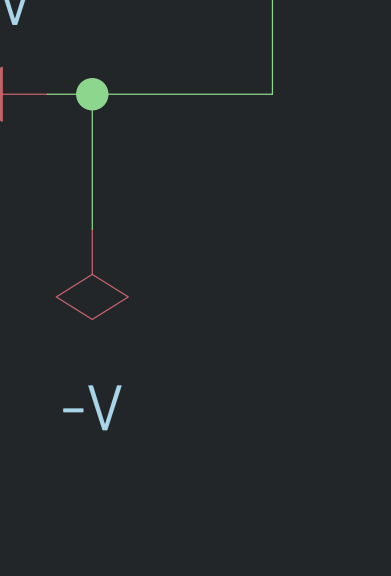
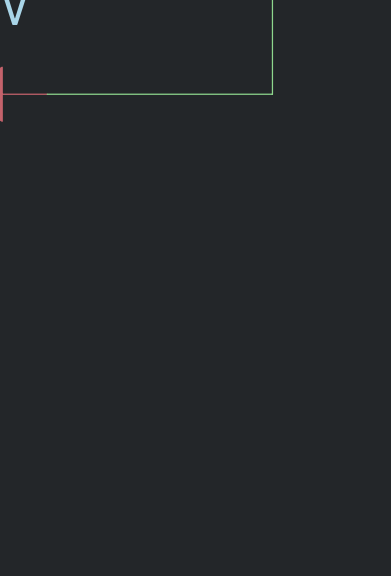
wire: (92, 94) (92, 229) -> none
junction: (92, 94) -> none
power symbol: -V (92, 274) -> none

